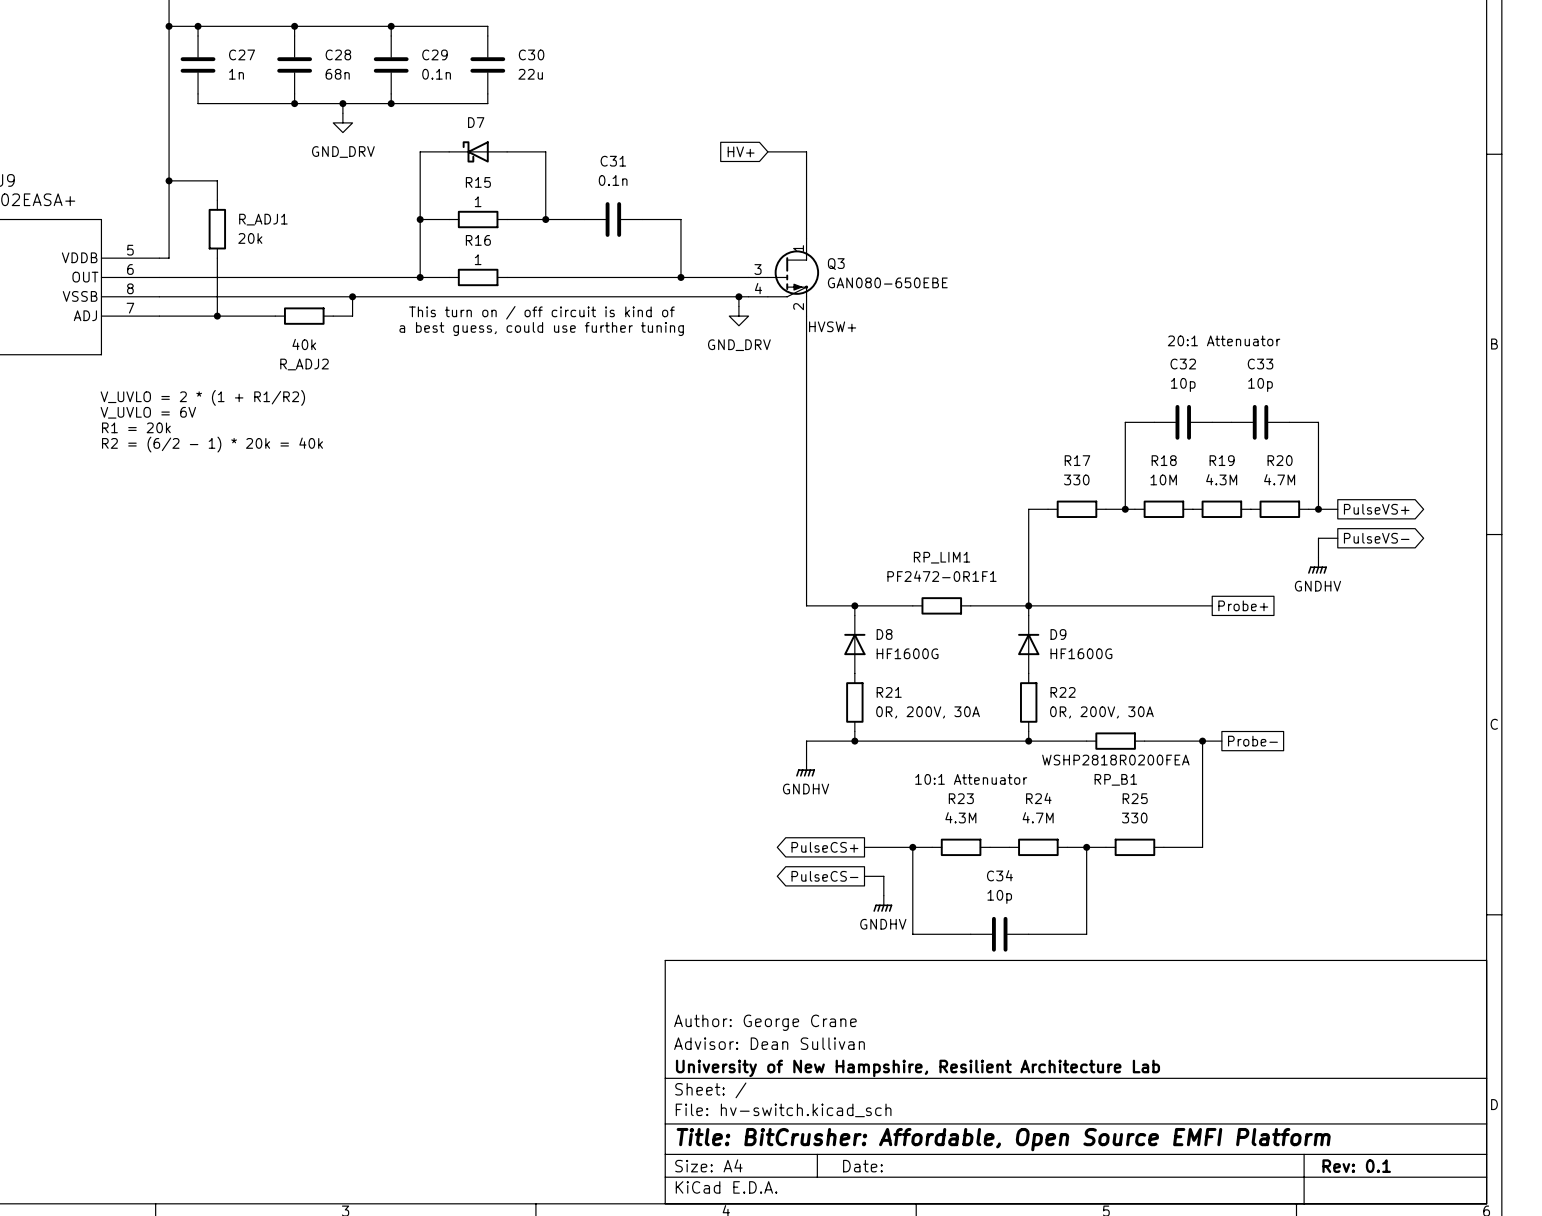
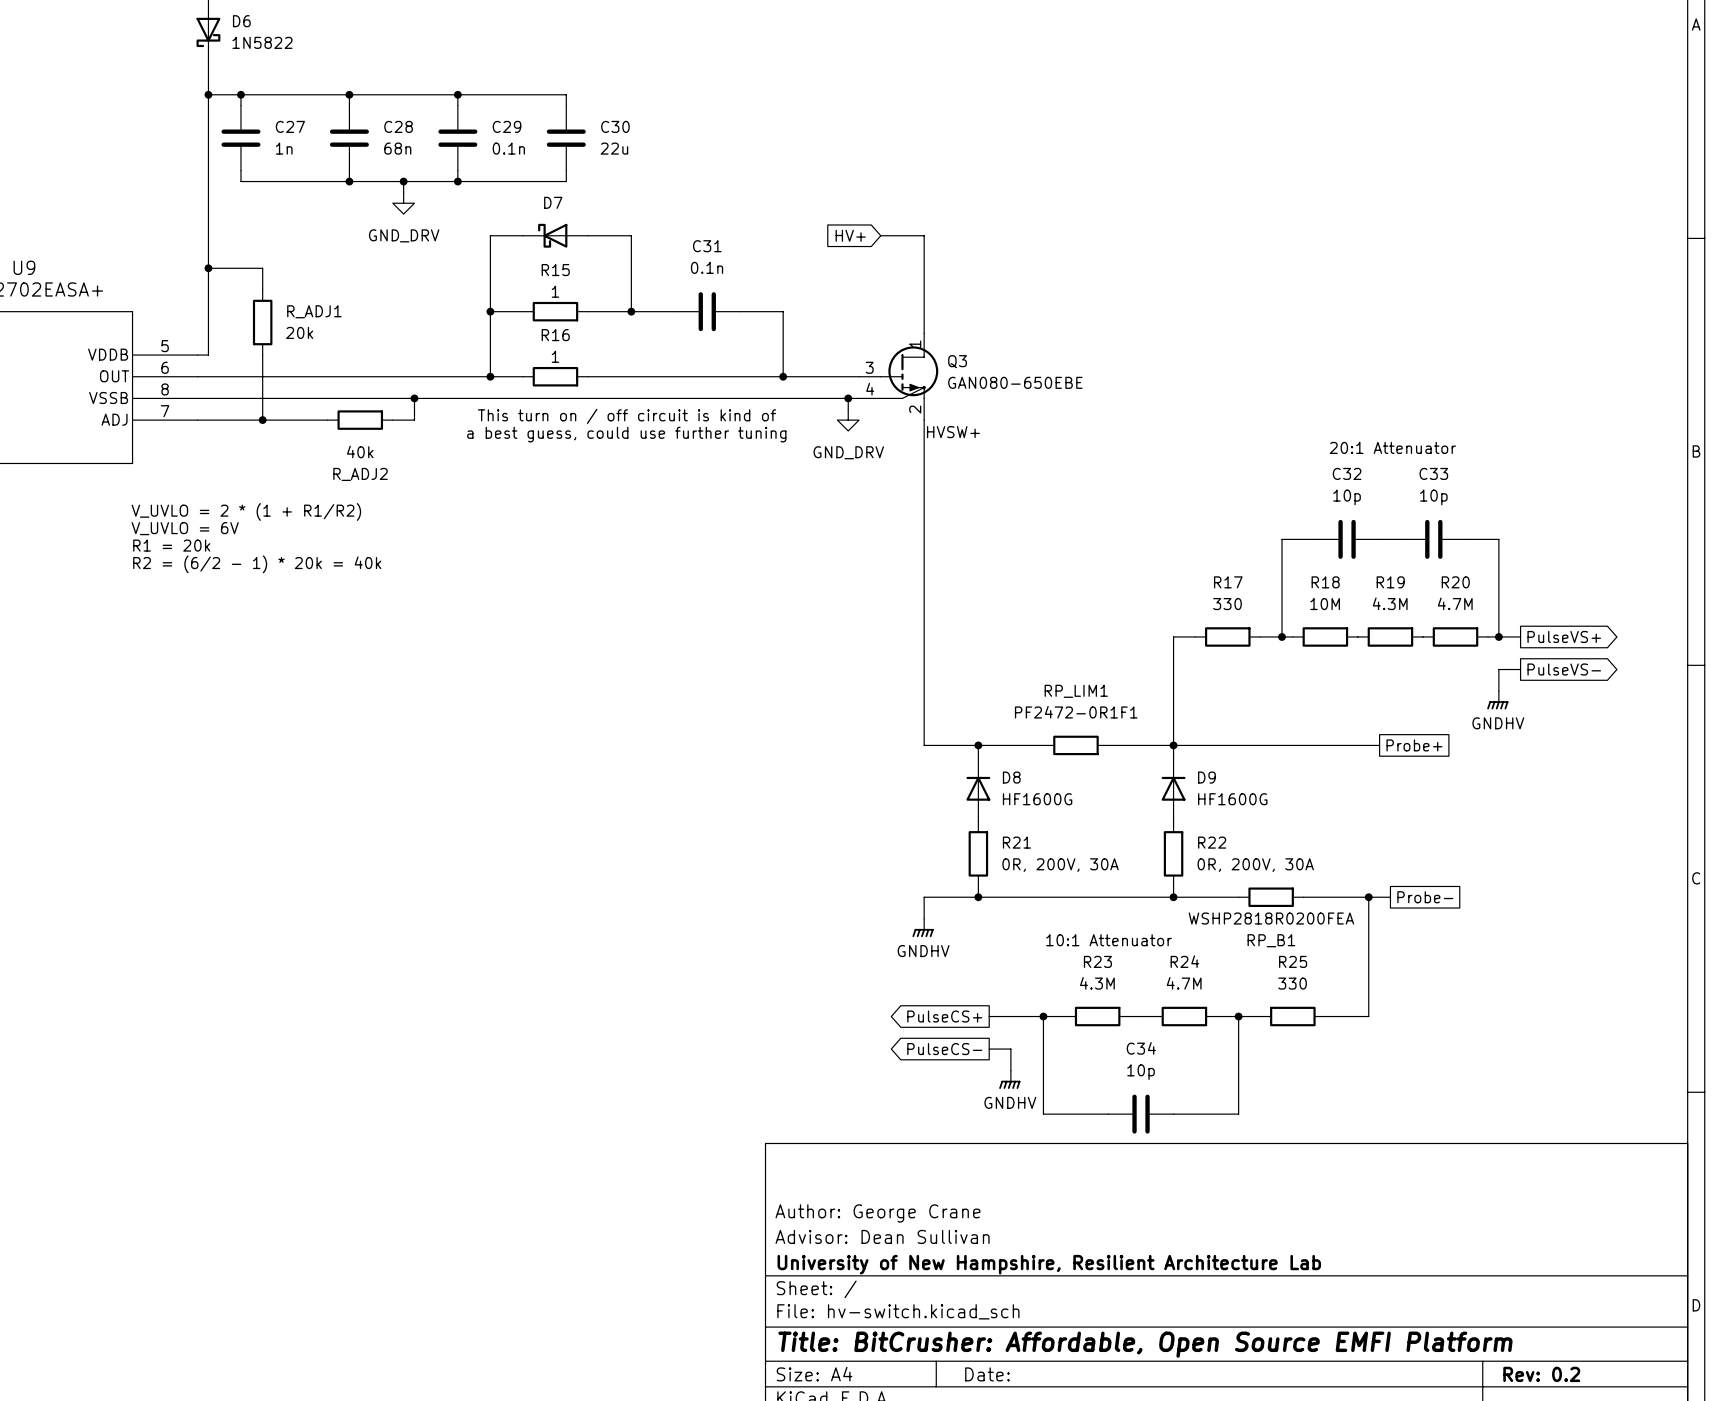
title block: Rev: 0.1 (1356, 1166) -> Rev: 0.2 (1541, 1374)

